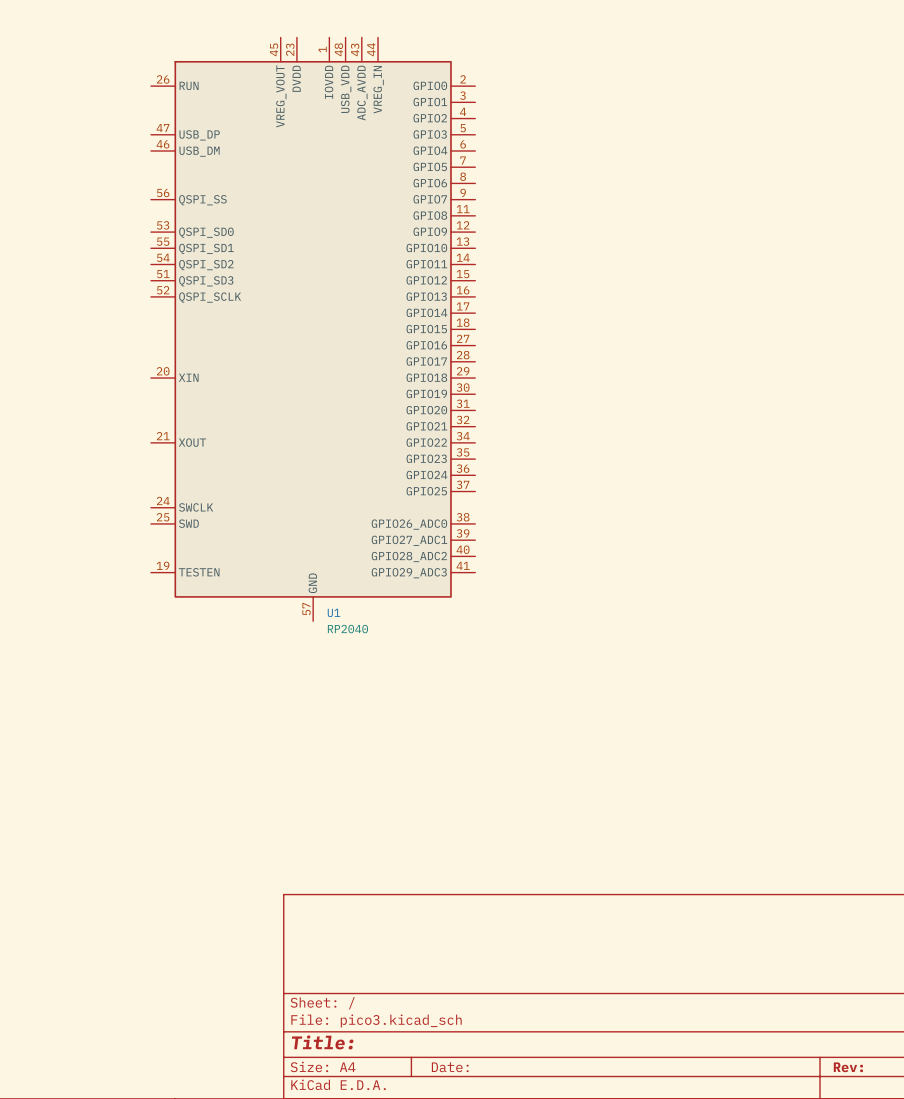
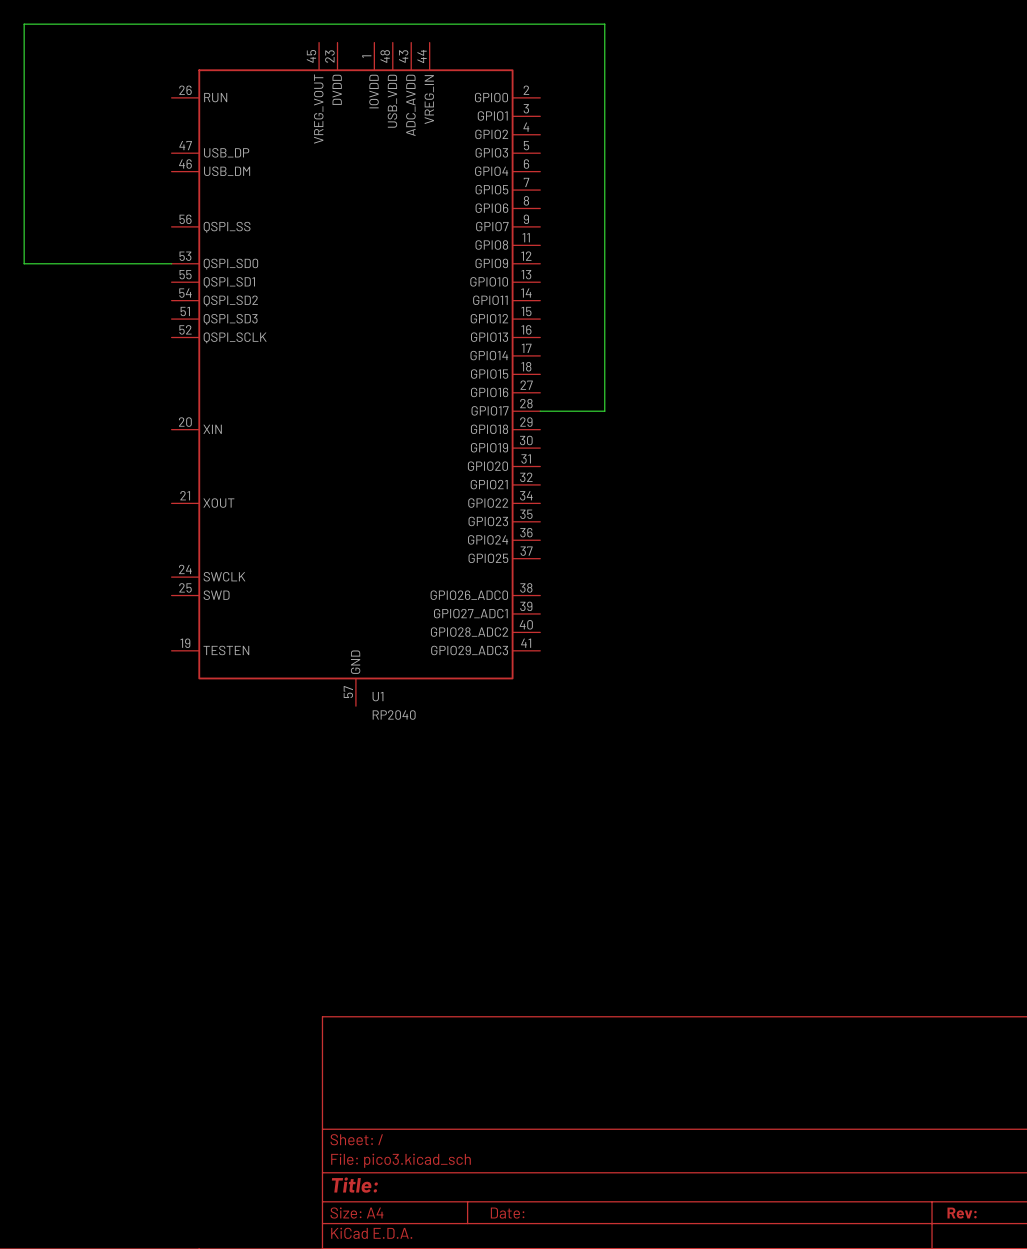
wire: none -> (171, 263) (24, 263) (24, 24) (604, 24) (604, 411) (540, 411)

